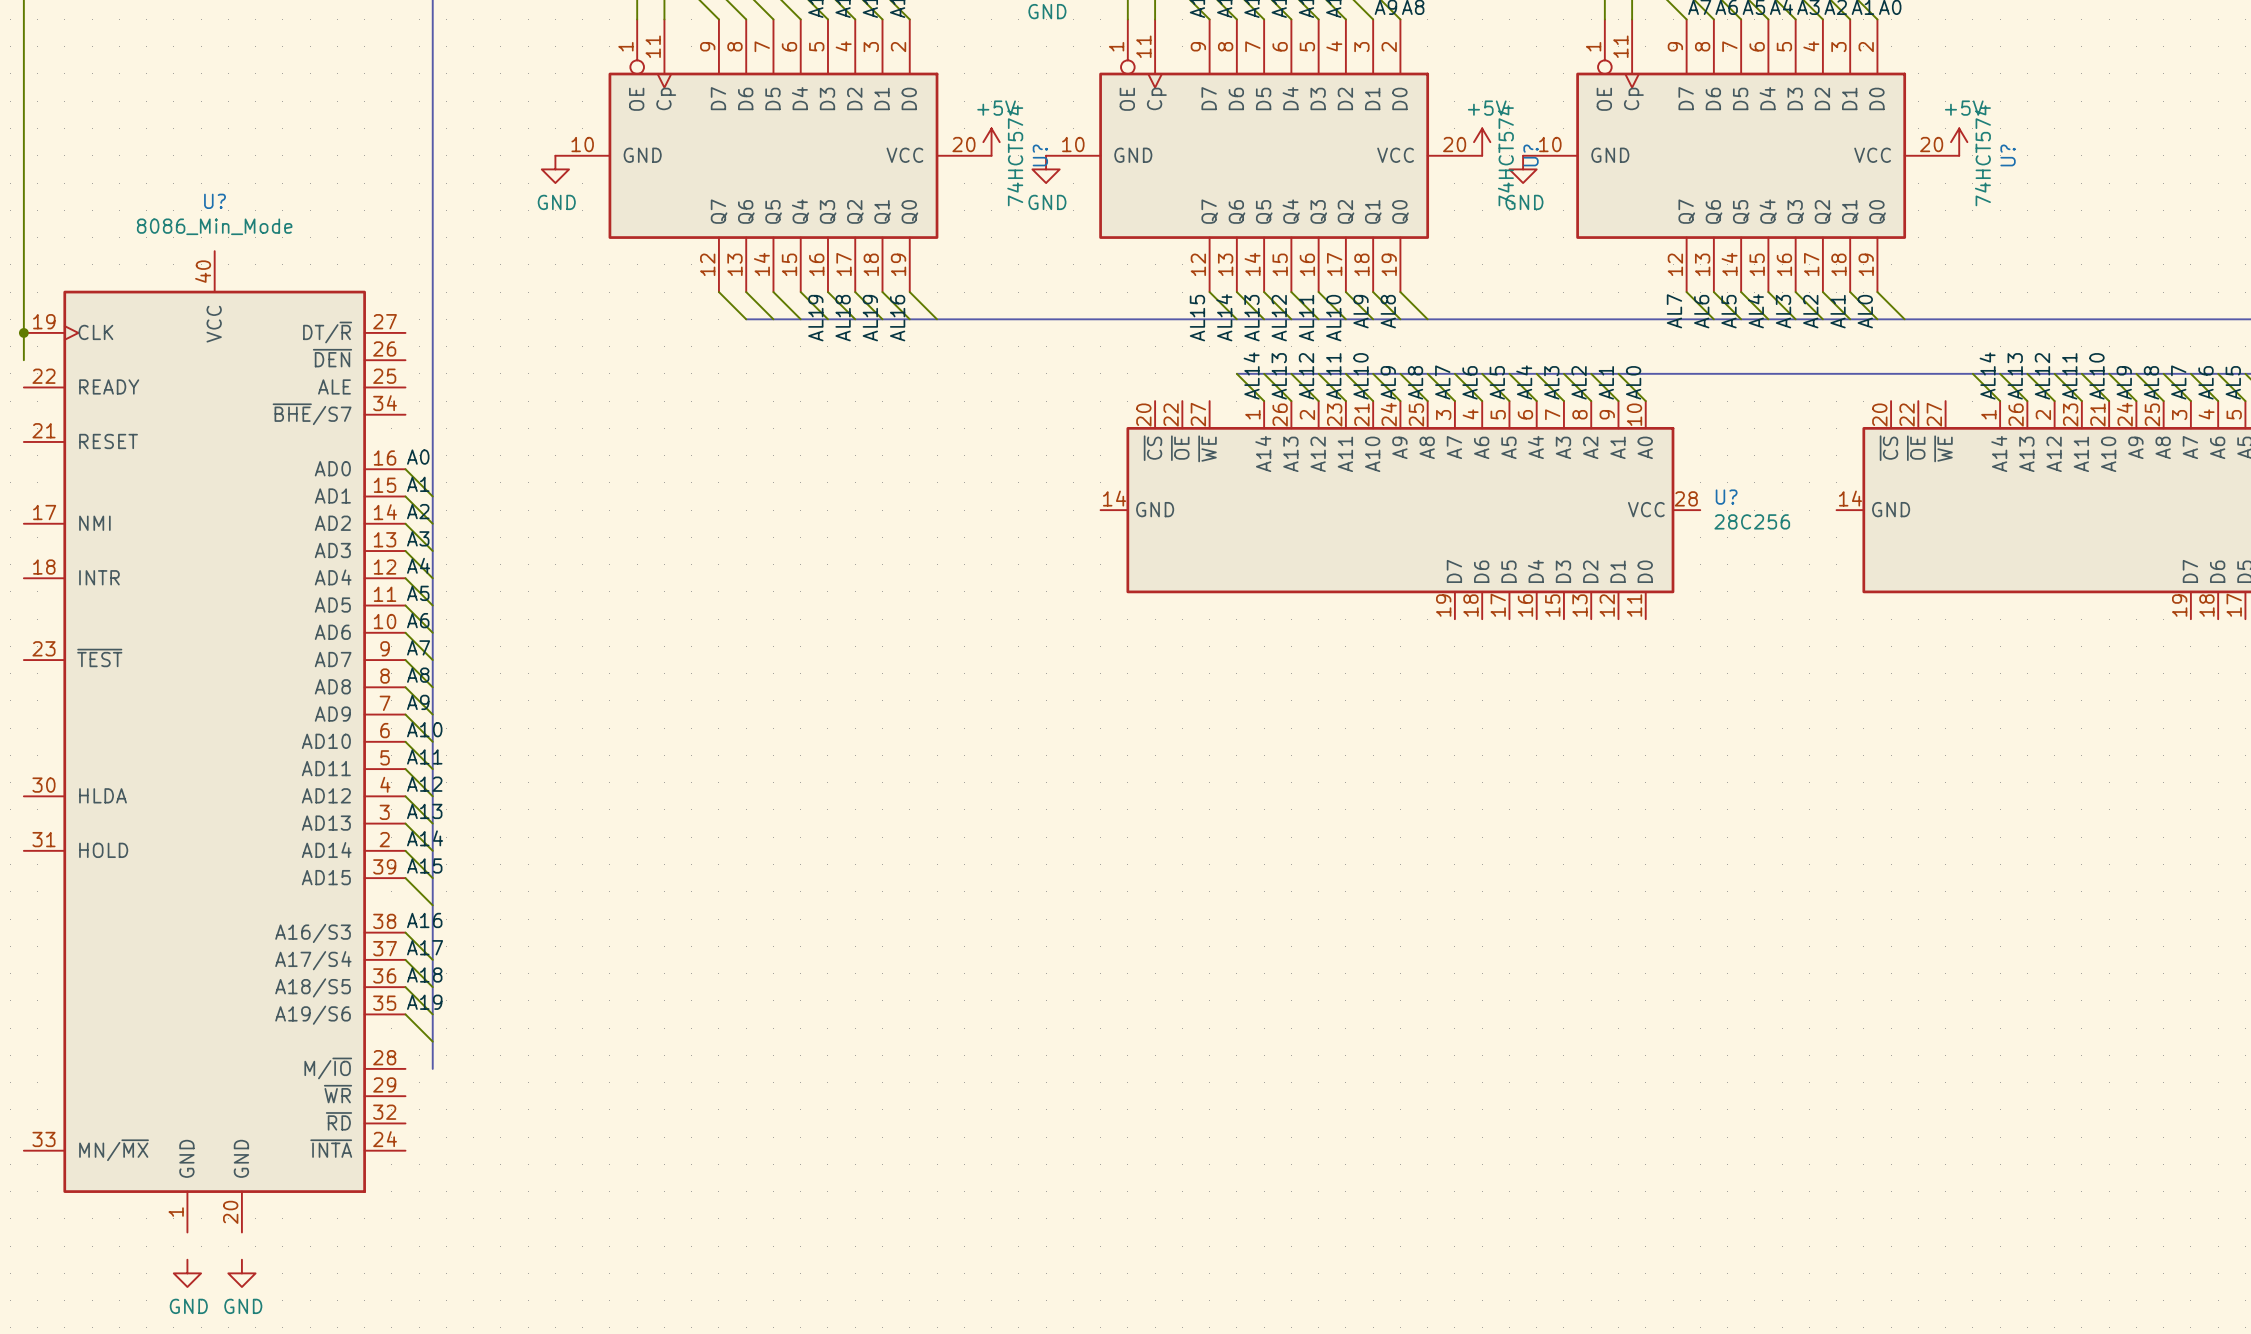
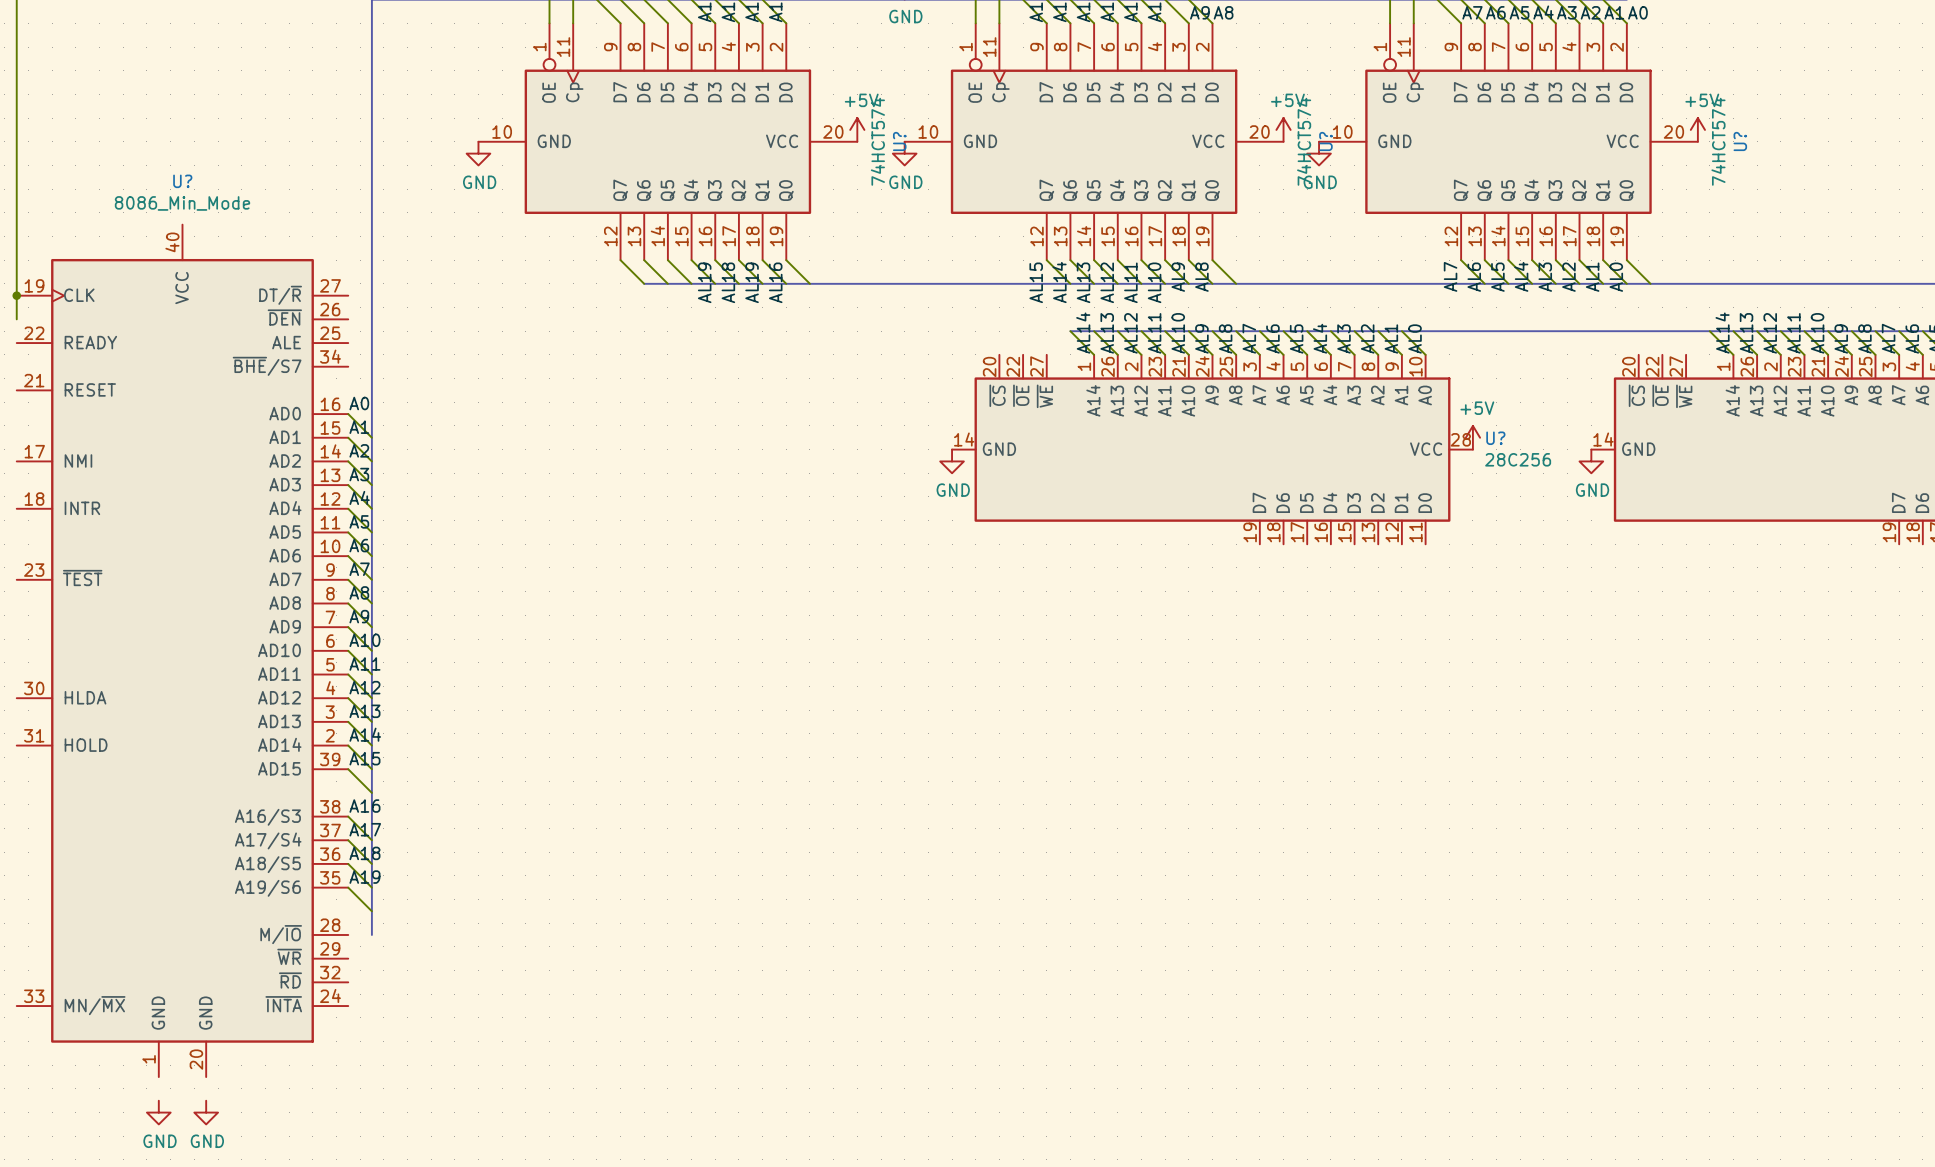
power symbol: none -> +5V (1472, 437)
power symbol: none -> GND (952, 461)
power symbol: none -> GND (1591, 461)

